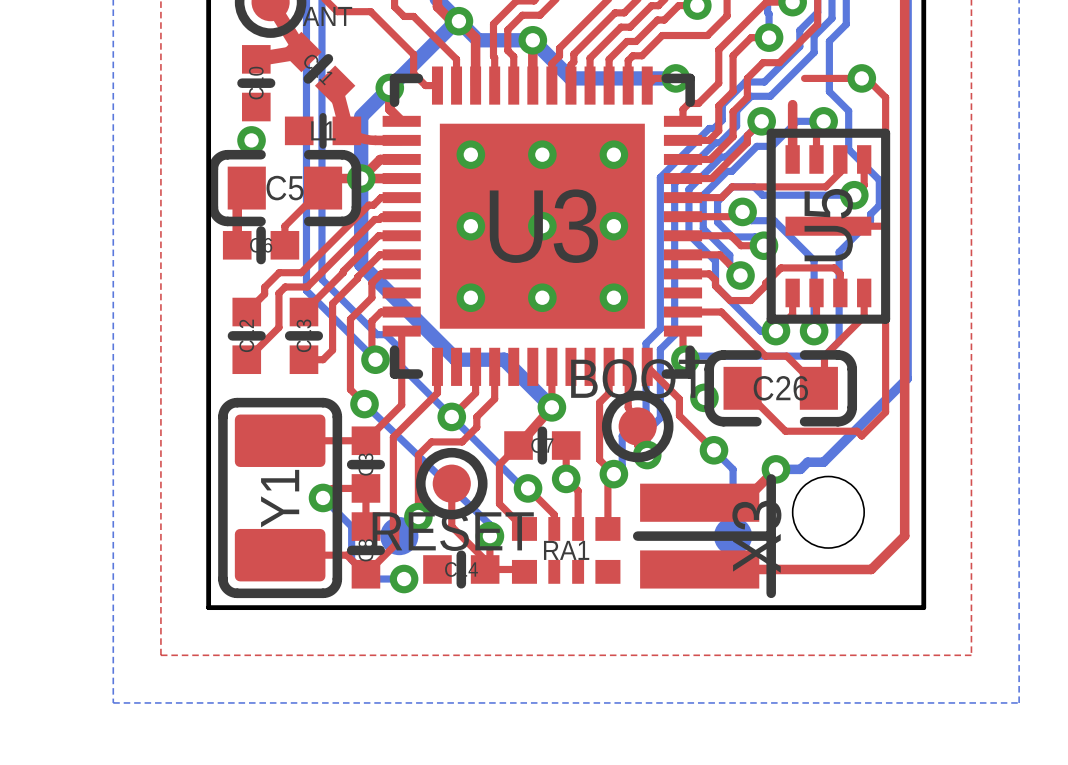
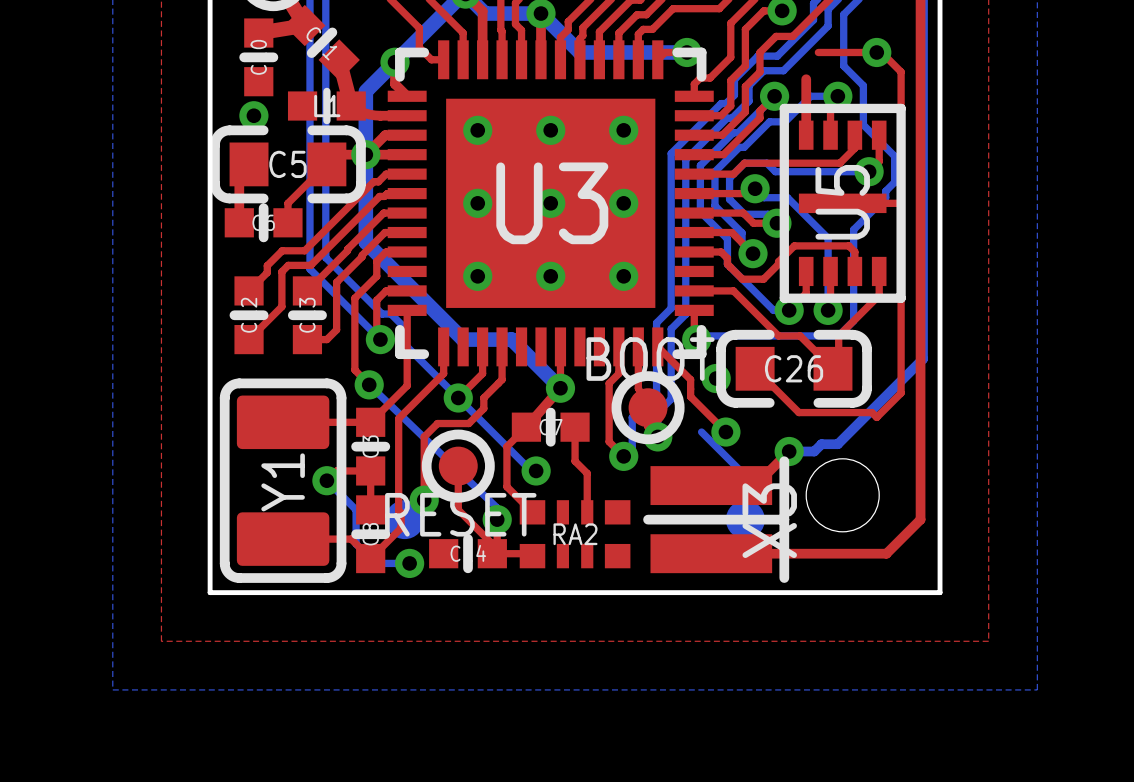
bottom track: (713, 450) (733, 469) (733, 493) -> (701, 432) (745, 475)
top track: (613, 474) (607, 480) (607, 528) -> none
via: (566, 478) -> none
top track: (528, 488) (554, 514) (554, 528) -> none
RA1 name: RA1 (566, 550) -> RA2 (575, 534)

